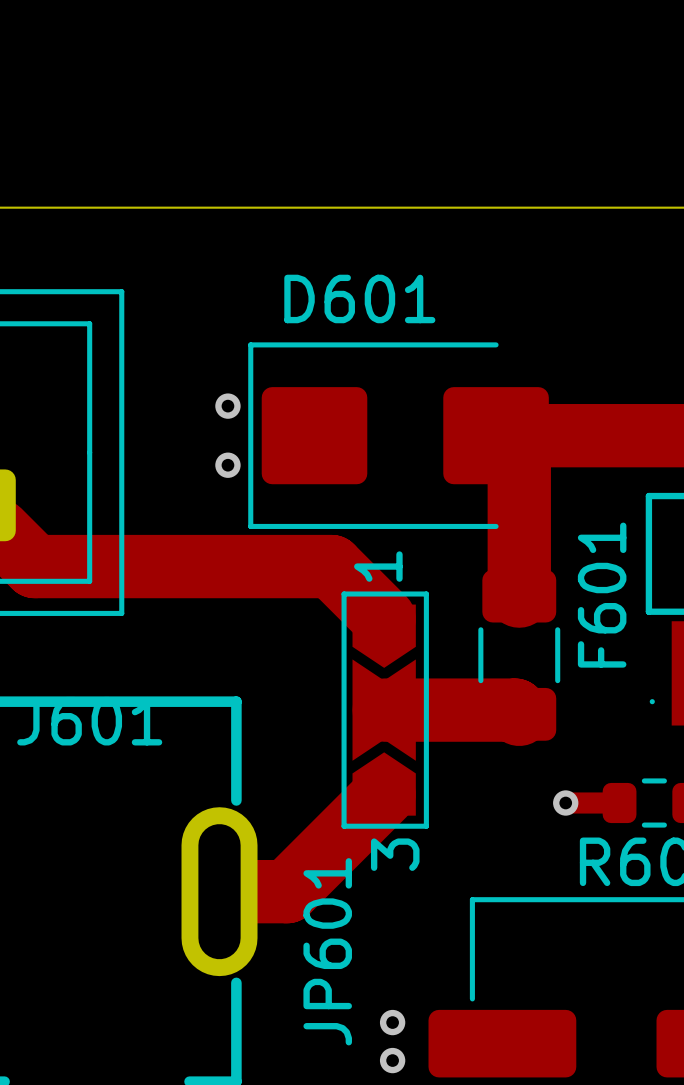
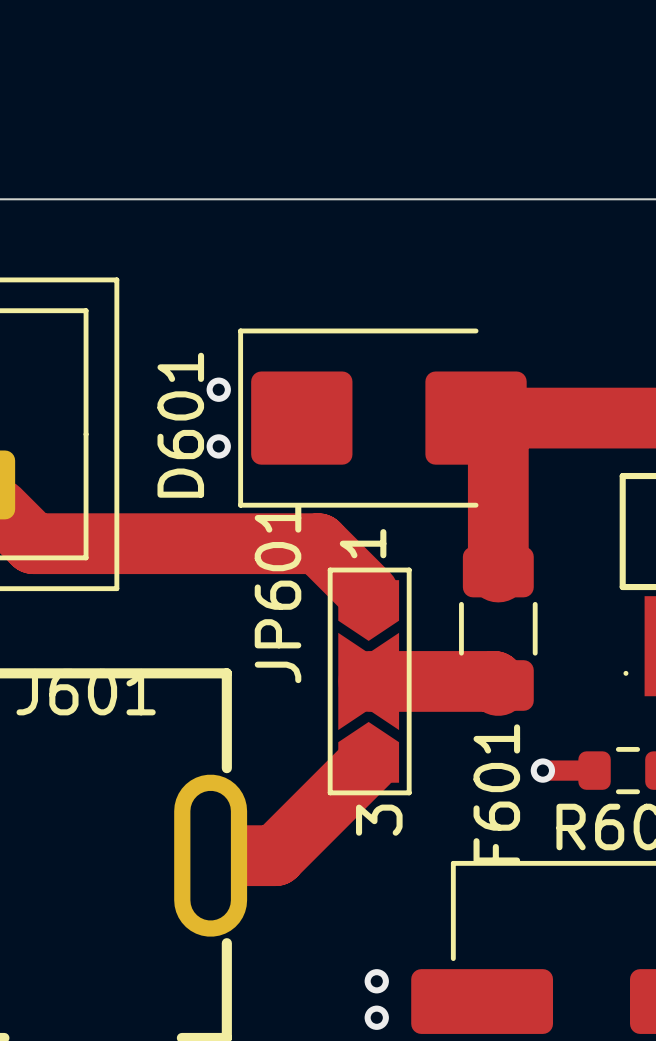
D601 name rotation: 0° (359, 298) -> 90° counterclockwise (180, 425)
D601 name position: D601 (359, 298) -> D601 (180, 425)
F601 name position: F601 (602, 595) -> F601 (496, 793)
JP601 name position: JP601 (327, 951) -> JP601 (278, 593)

